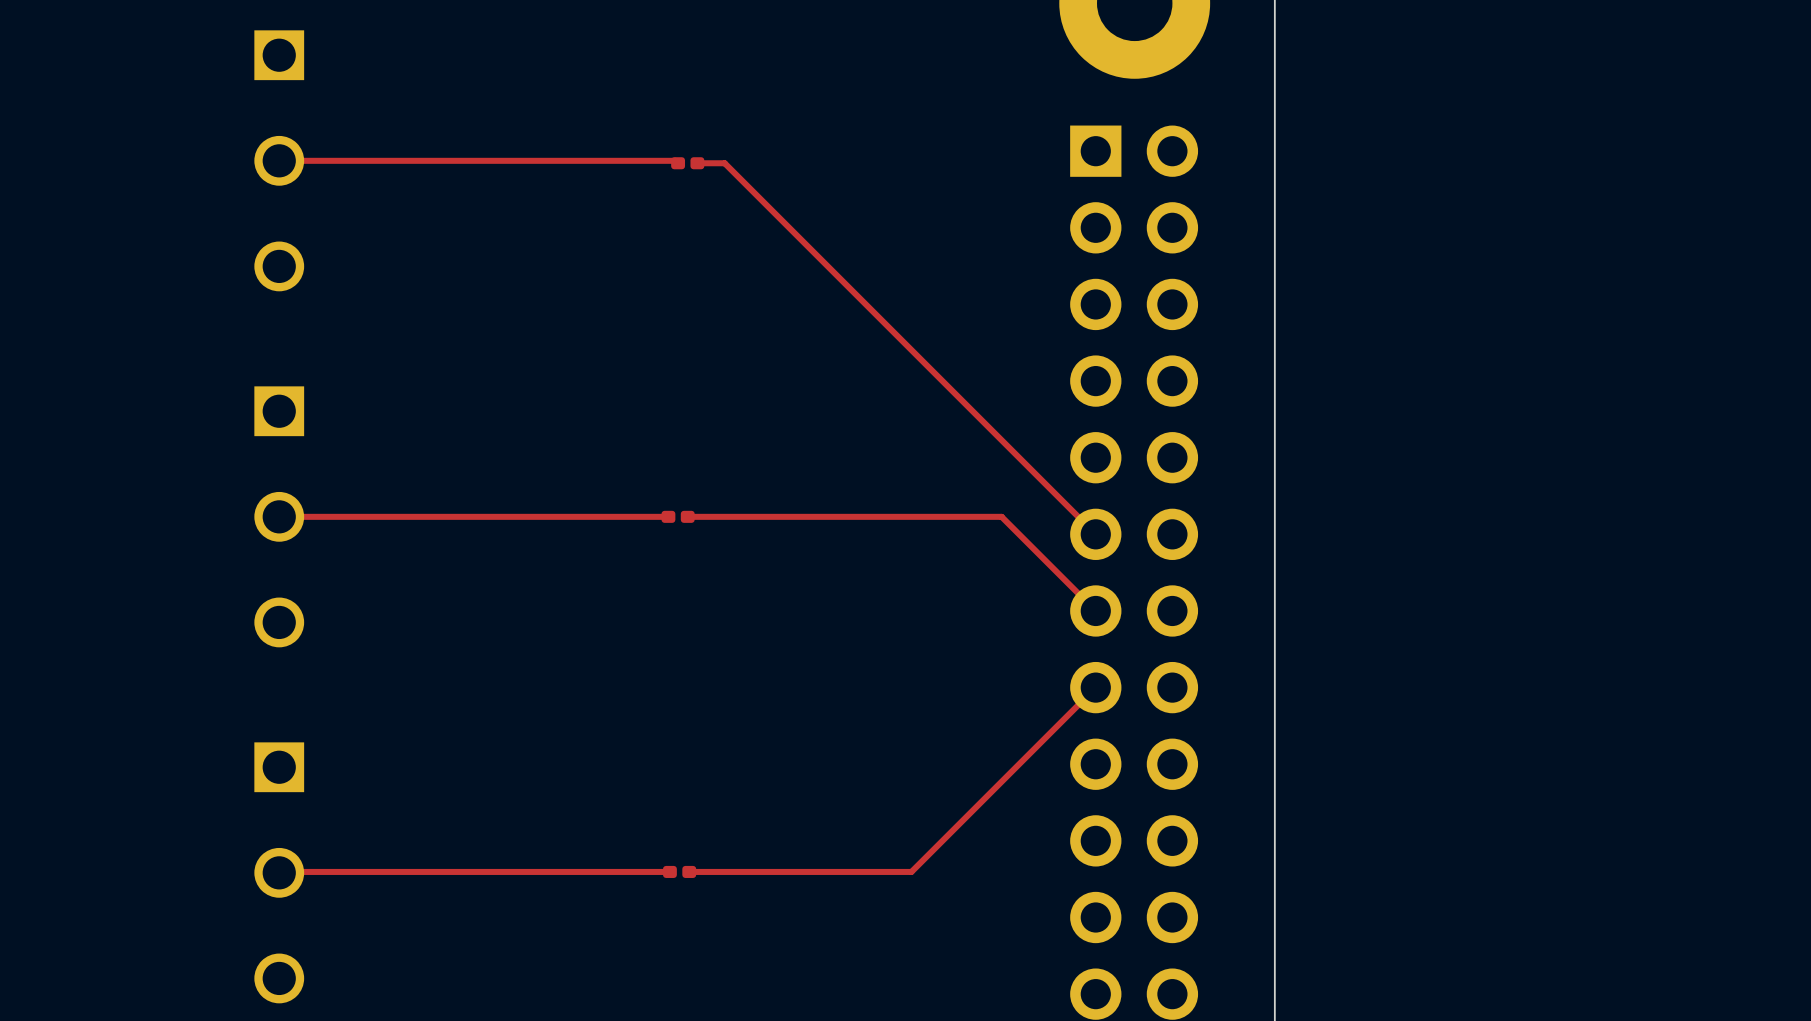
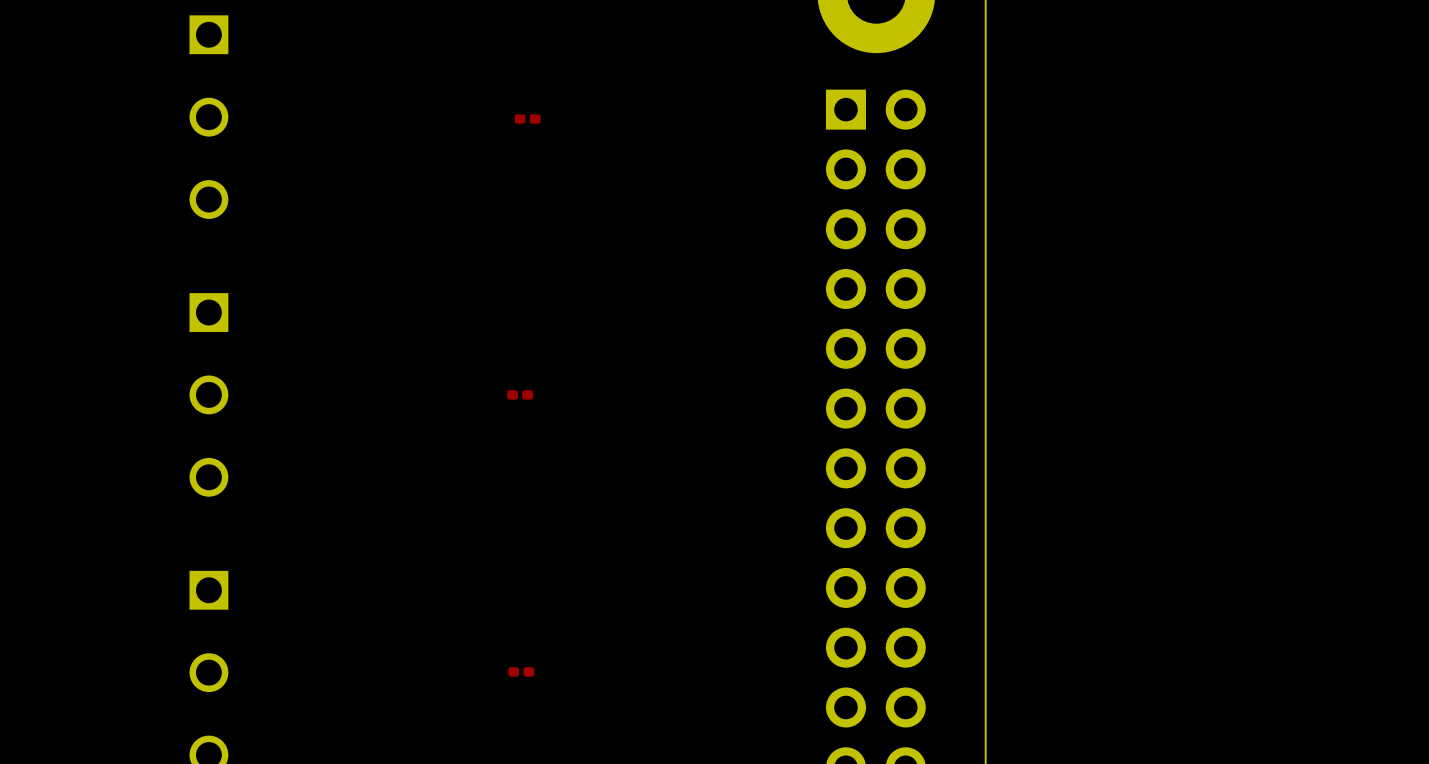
top track: (279, 160) (675, 160) (678, 163) -> none
top track: (697, 163) (724, 163) (1095, 534) -> none
top track: (668, 516) (279, 516) -> none
top track: (687, 516) (1001, 516) (1095, 610) -> none
top track: (1095, 687) (911, 871) (689, 871) -> none
top track: (669, 871) (279, 872) -> none

